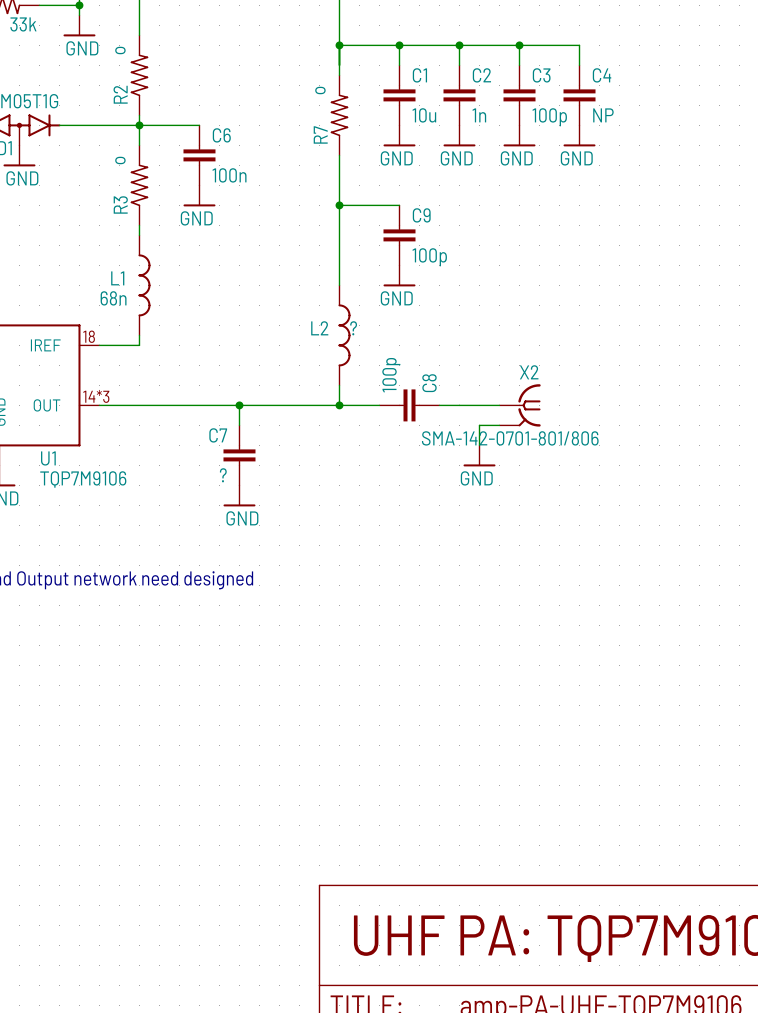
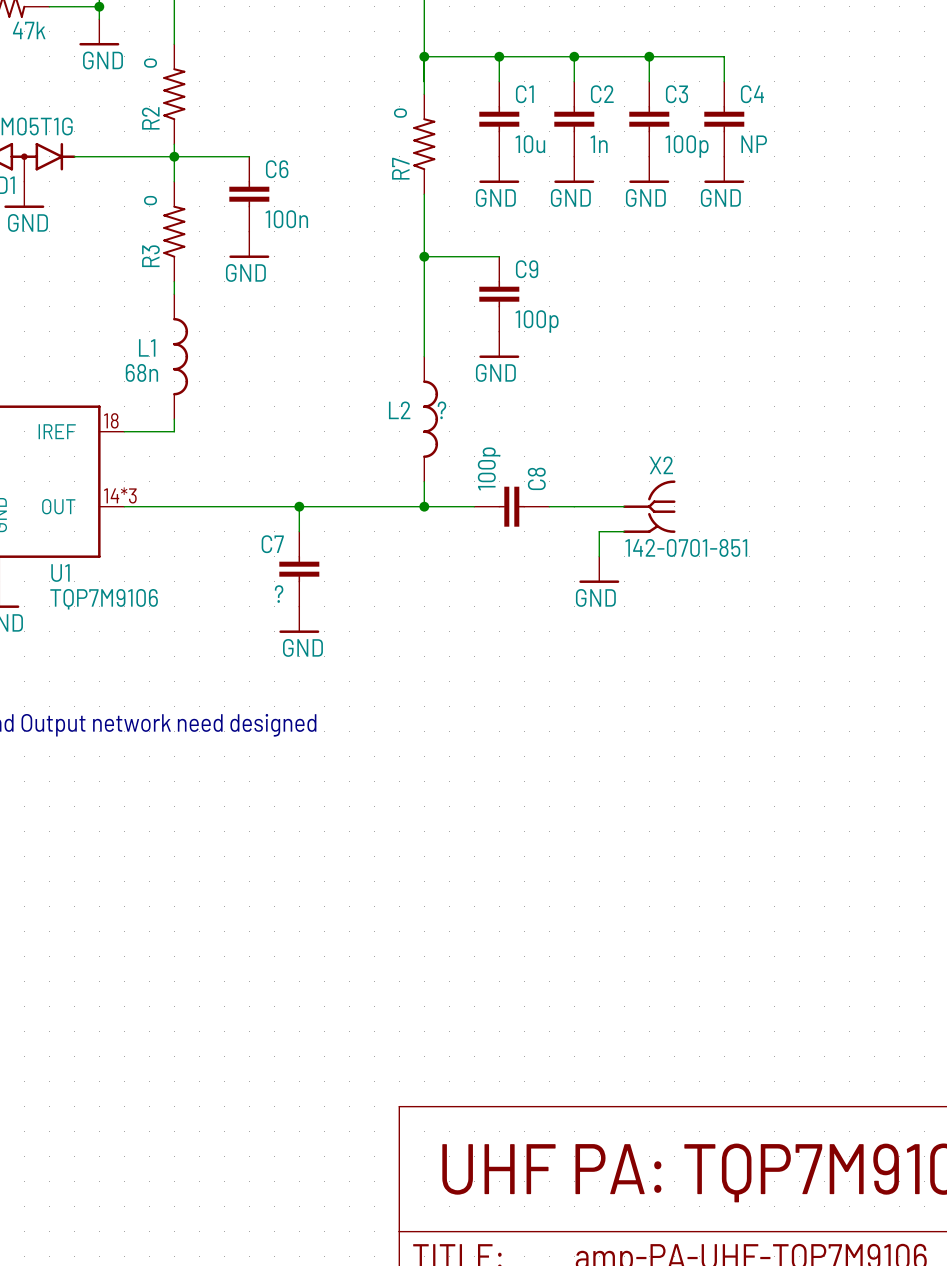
part value: 33k (23, 24) -> 47k (29, 30)
X2 symbol: [499, 384, 541, 427] -> [623, 480, 676, 533]
X2 value: SMA-142-0701-801/806 (510, 438) -> 142-0701-851 (686, 547)

